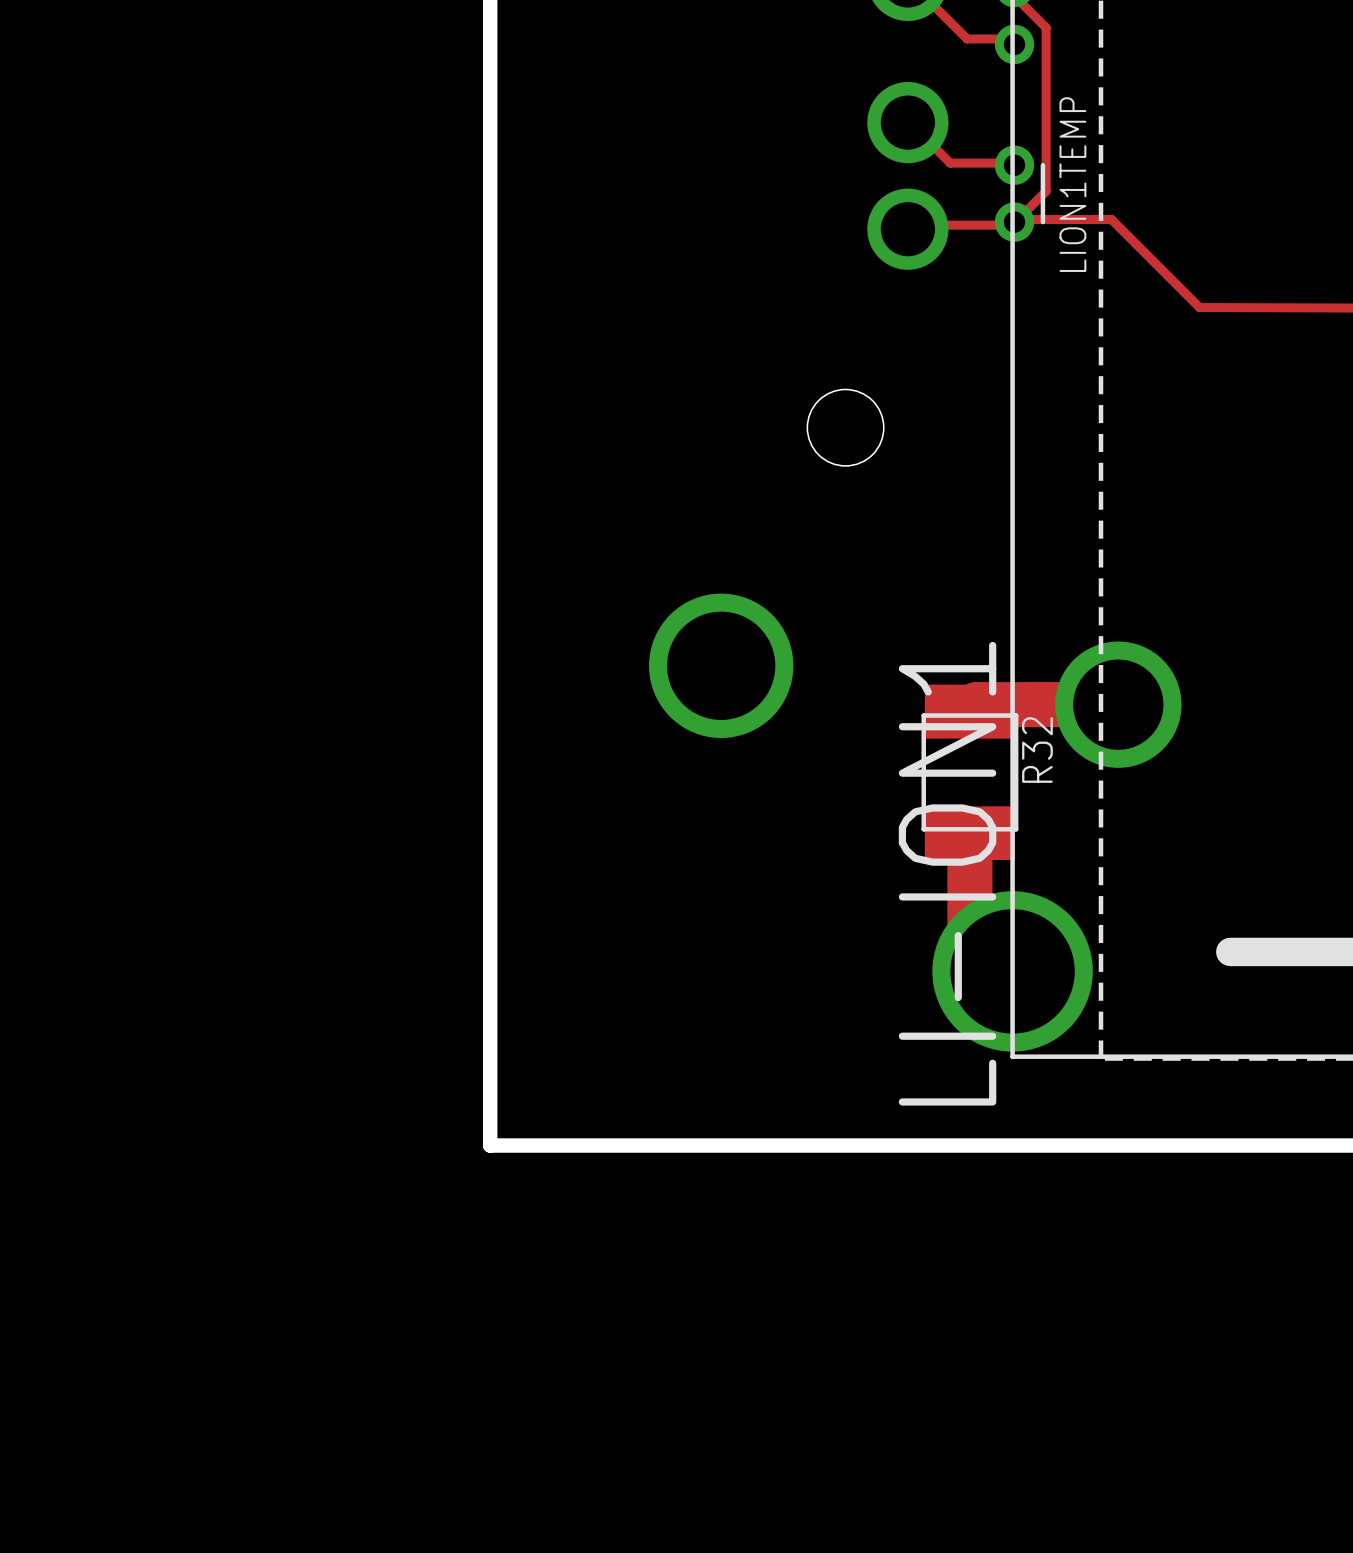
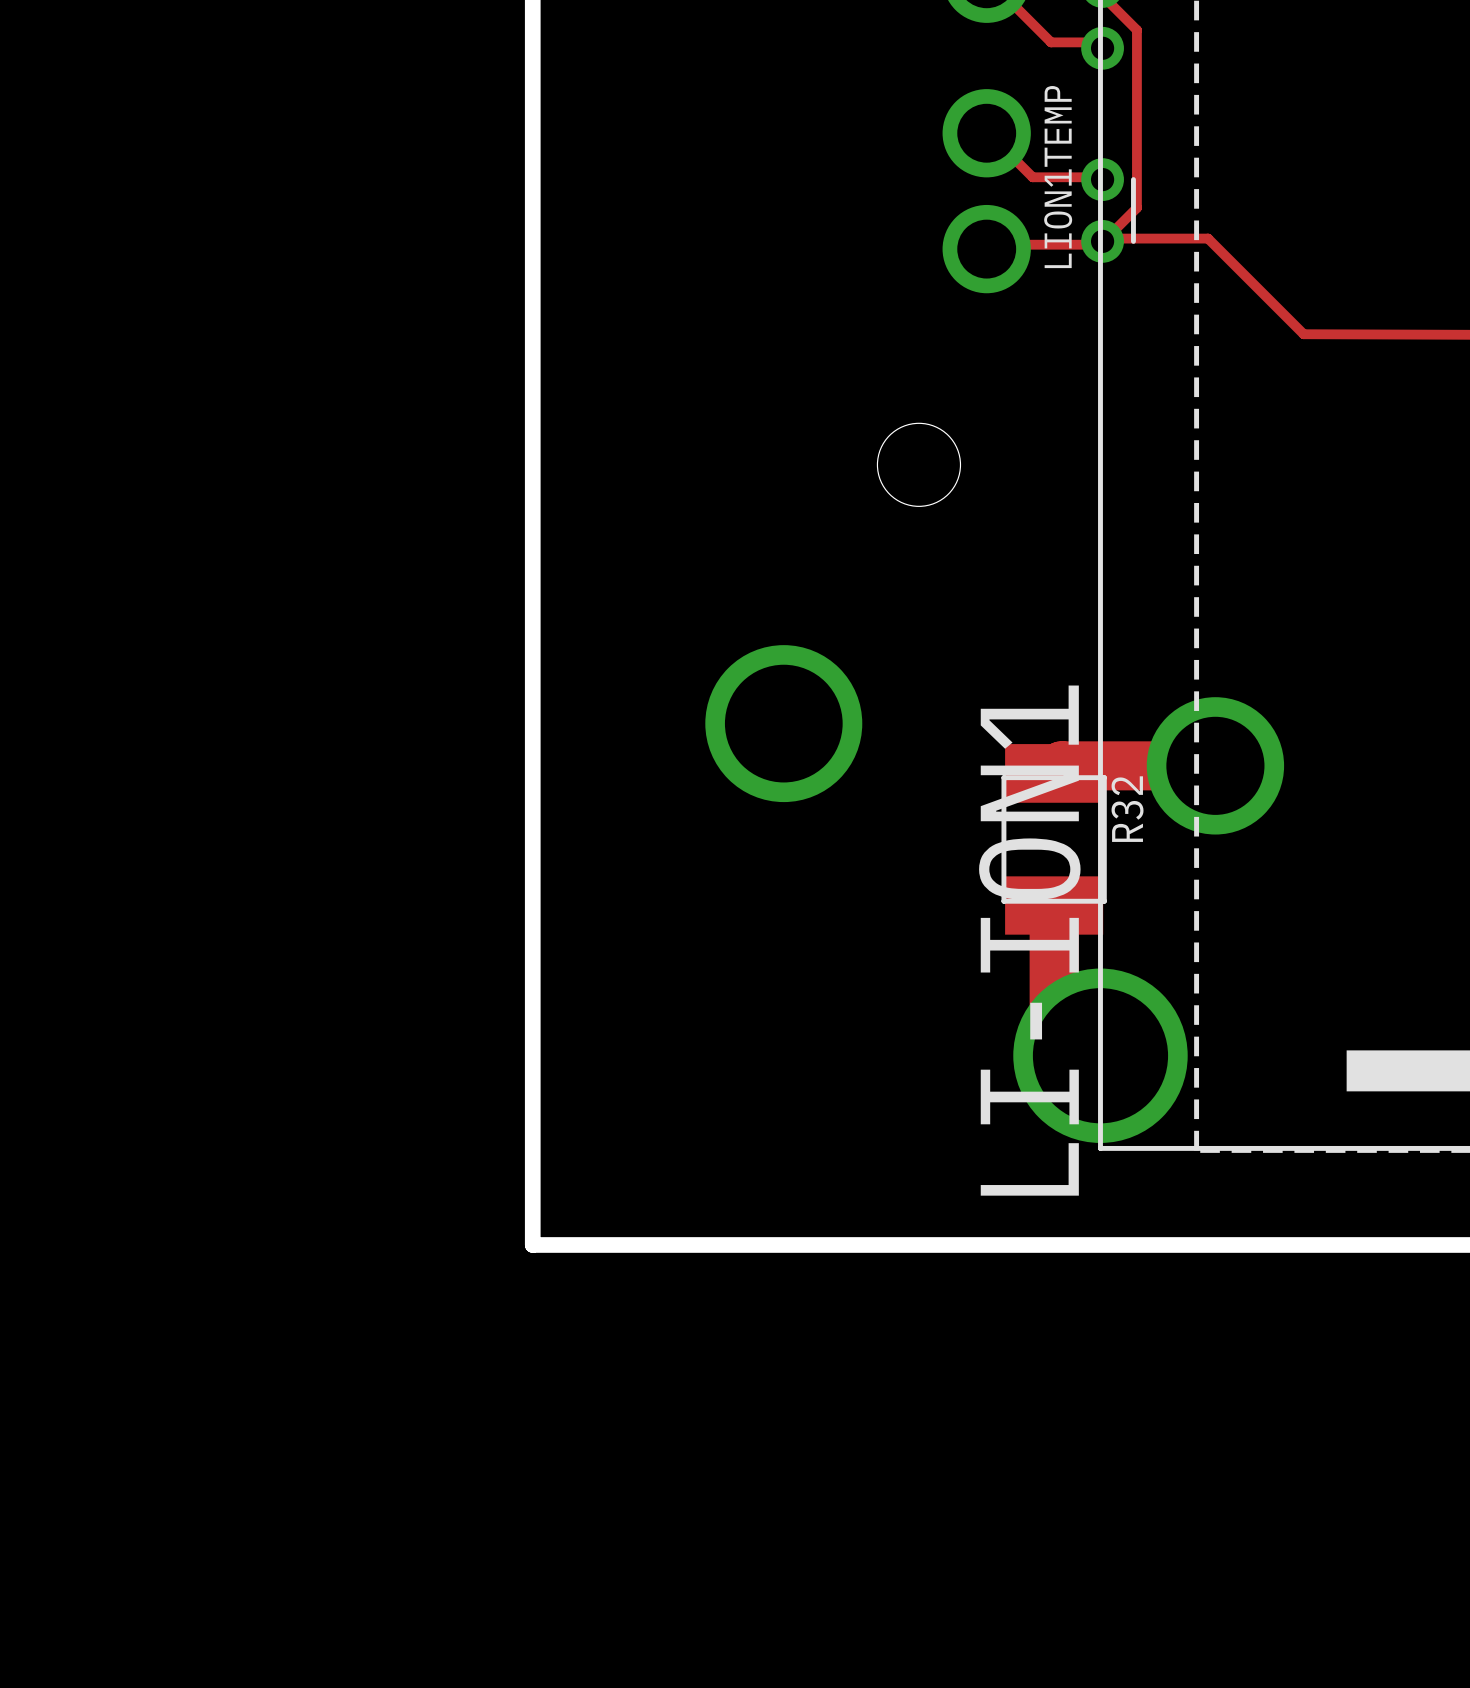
LION1TEMP name position: LION1TEMP (1072, 184) -> LION1TEMP (1058, 177)

